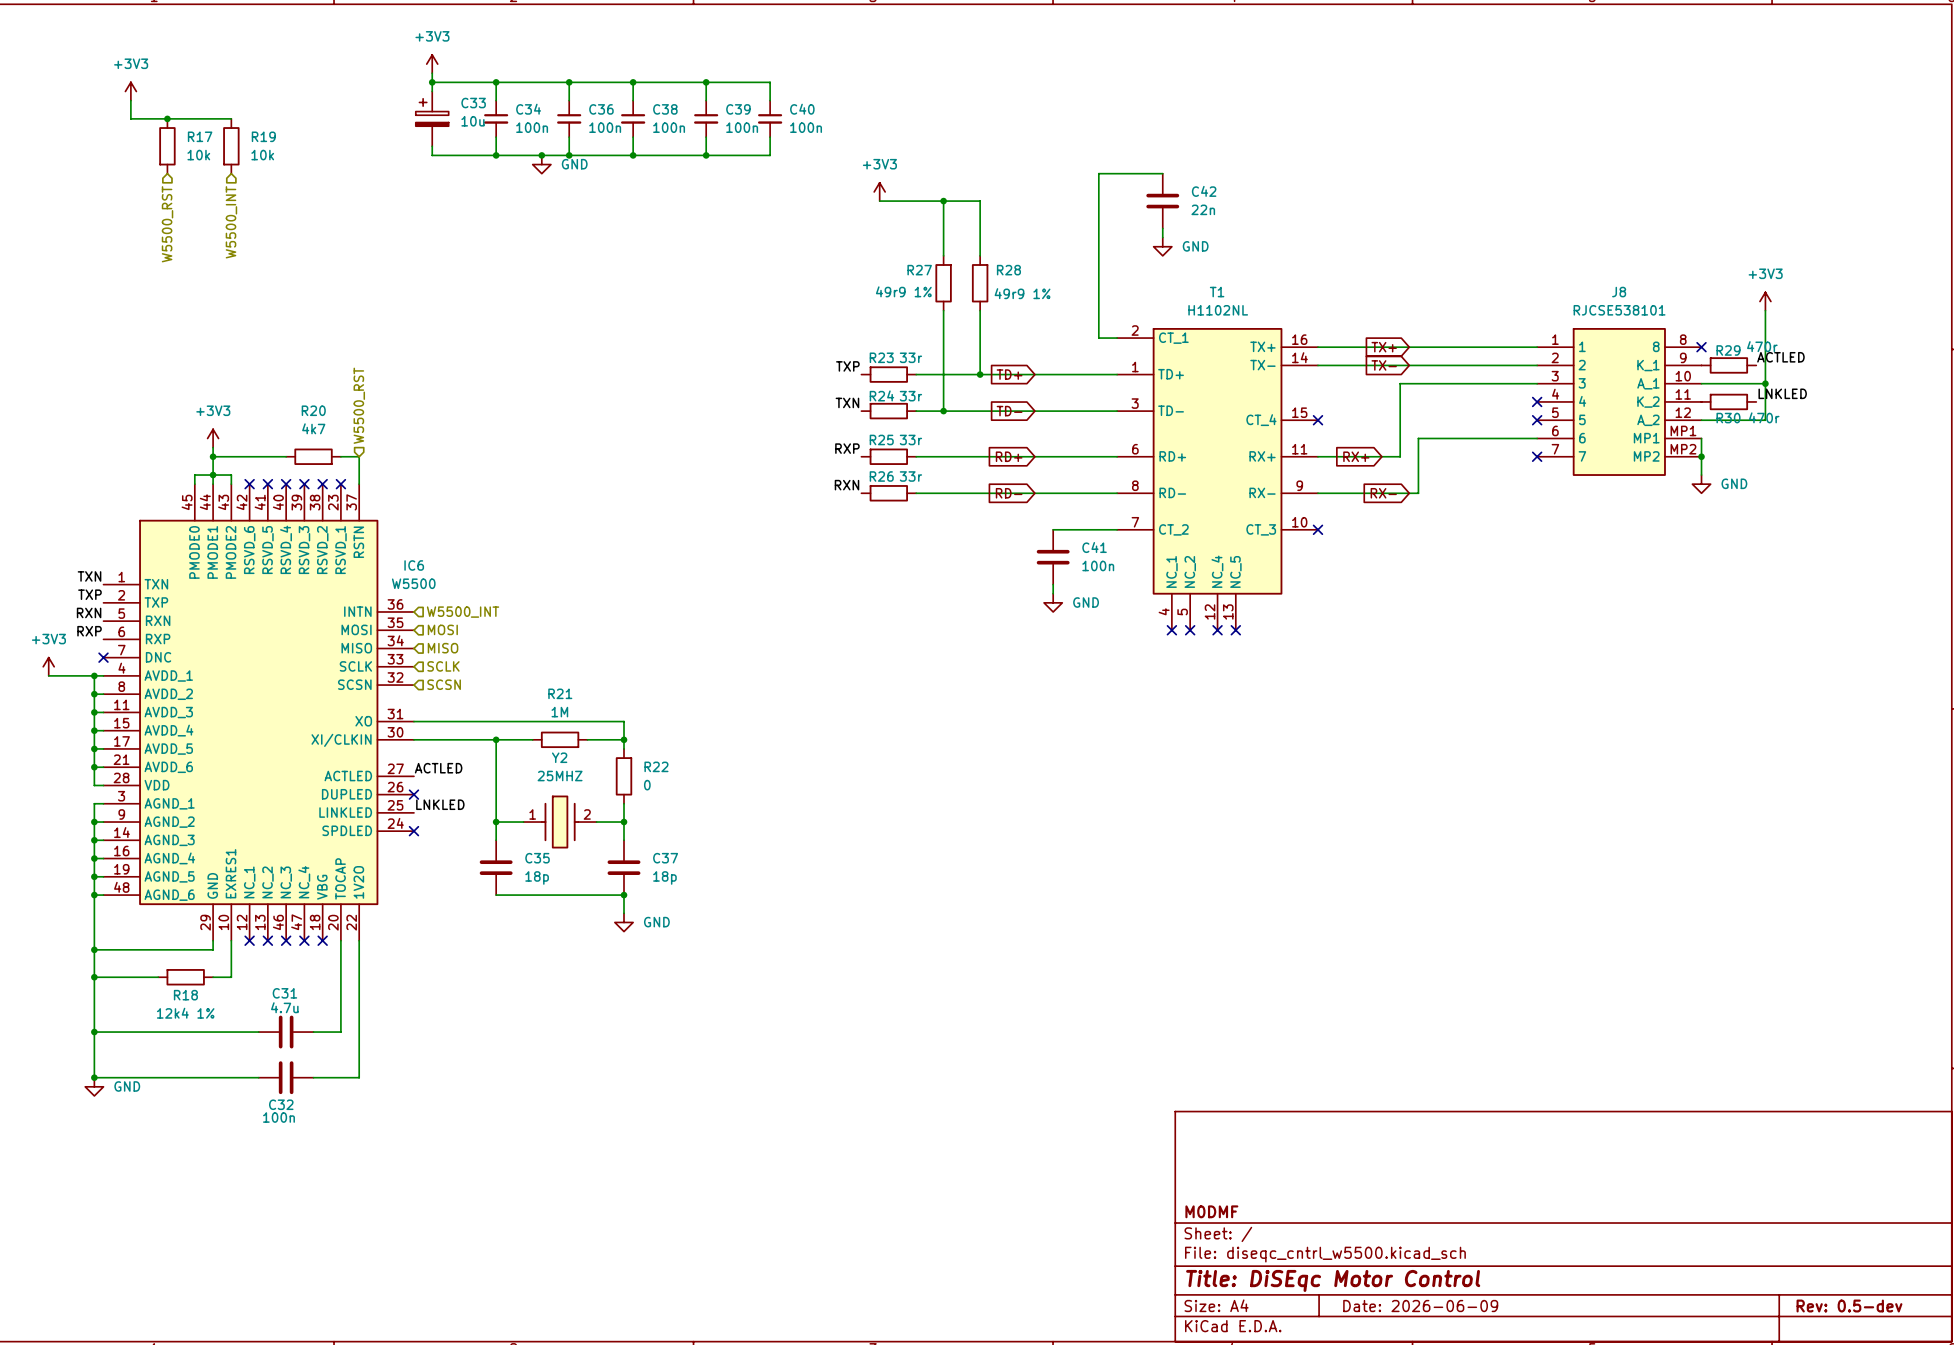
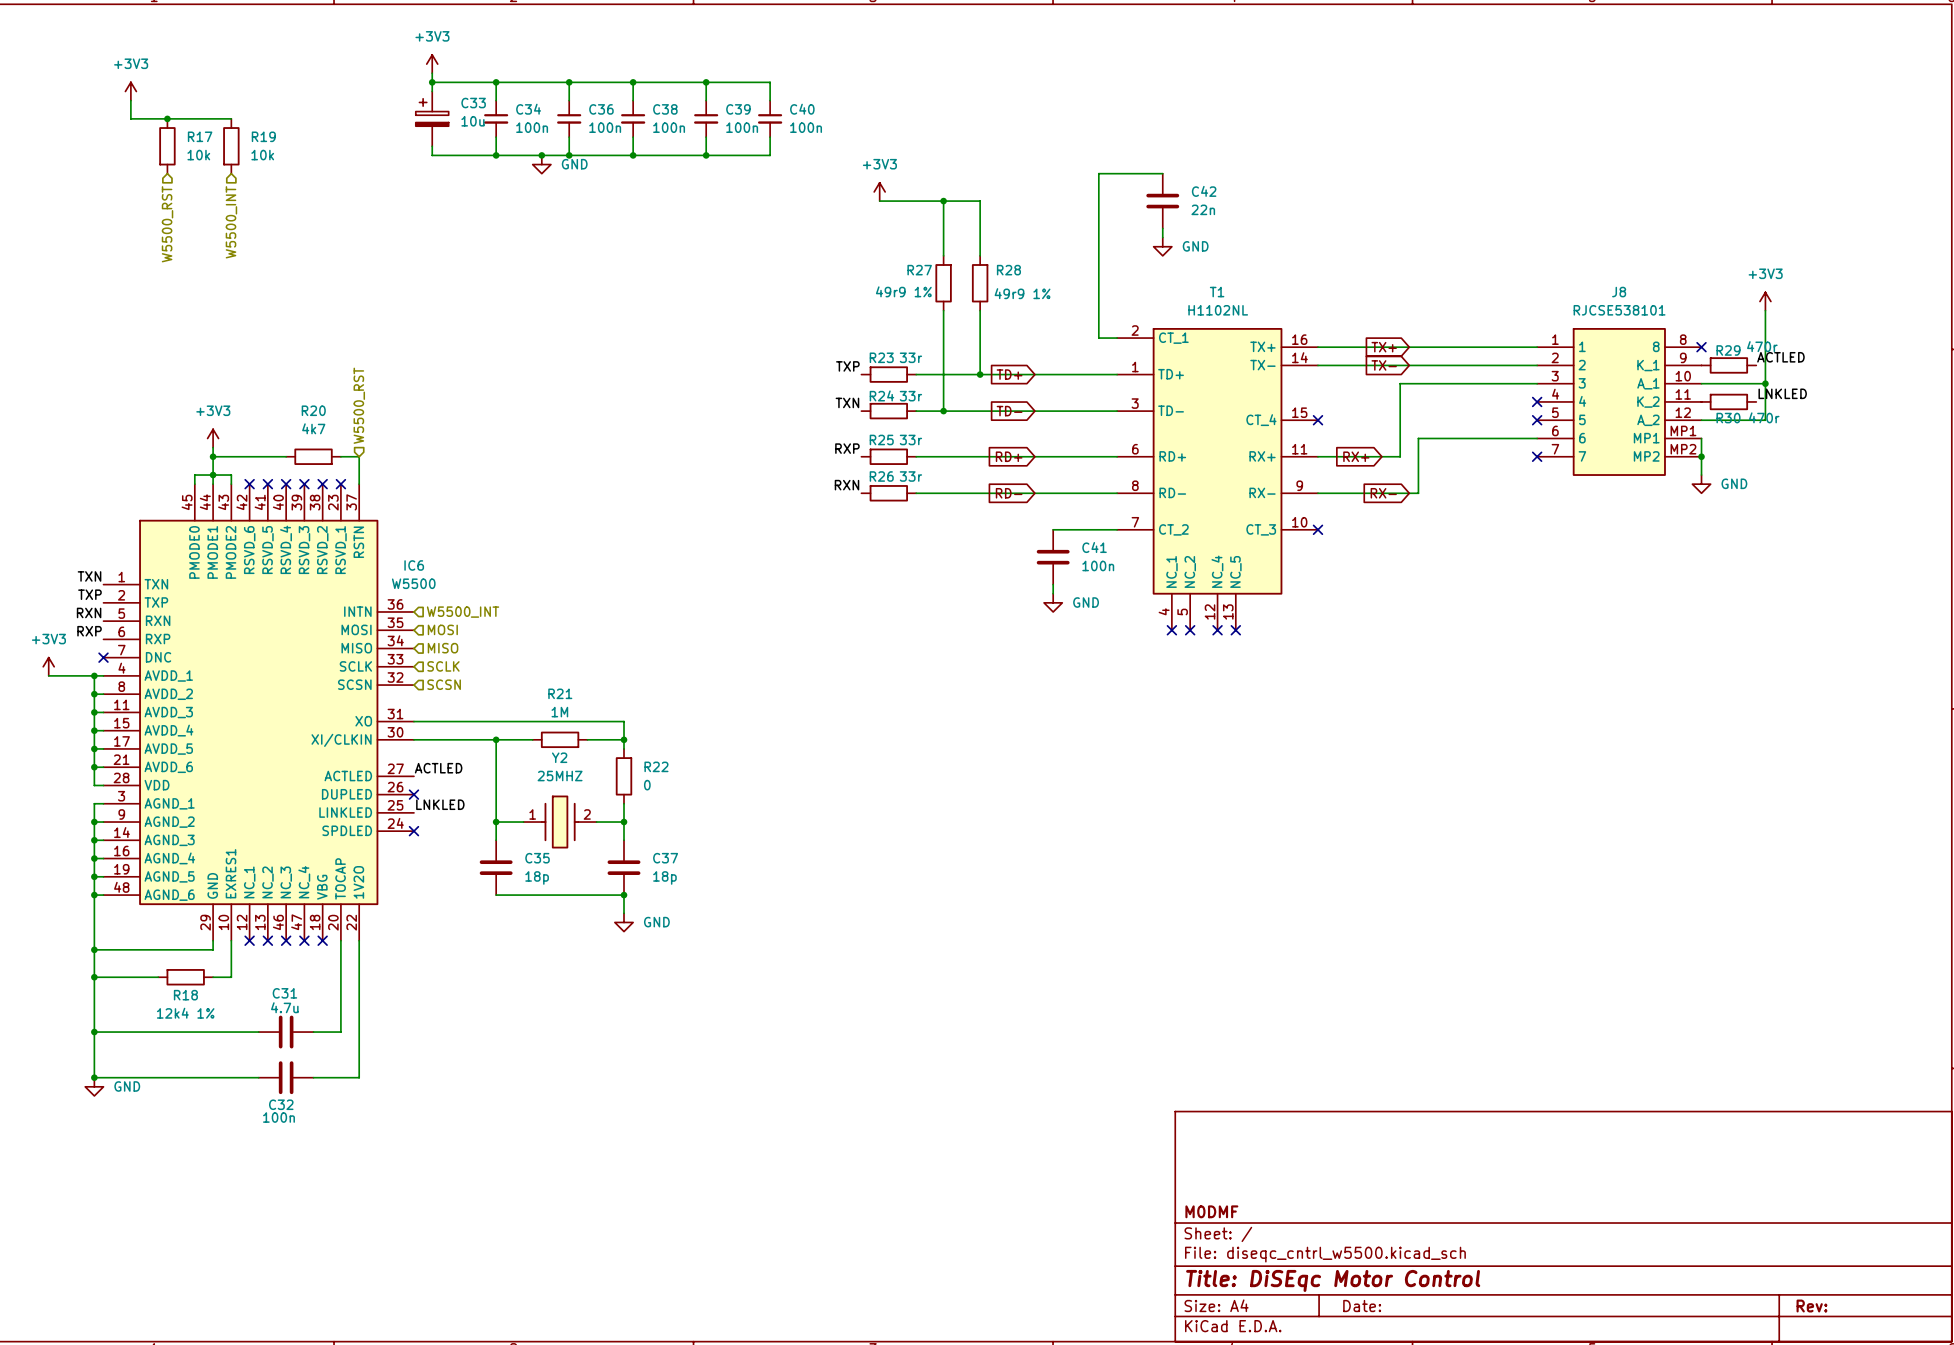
title block: Date: 2026-06-09 (1420, 1306) -> Date: (1362, 1306)
title block: Rev: 0.5-dev (1849, 1306) -> Rev: (1811, 1306)

